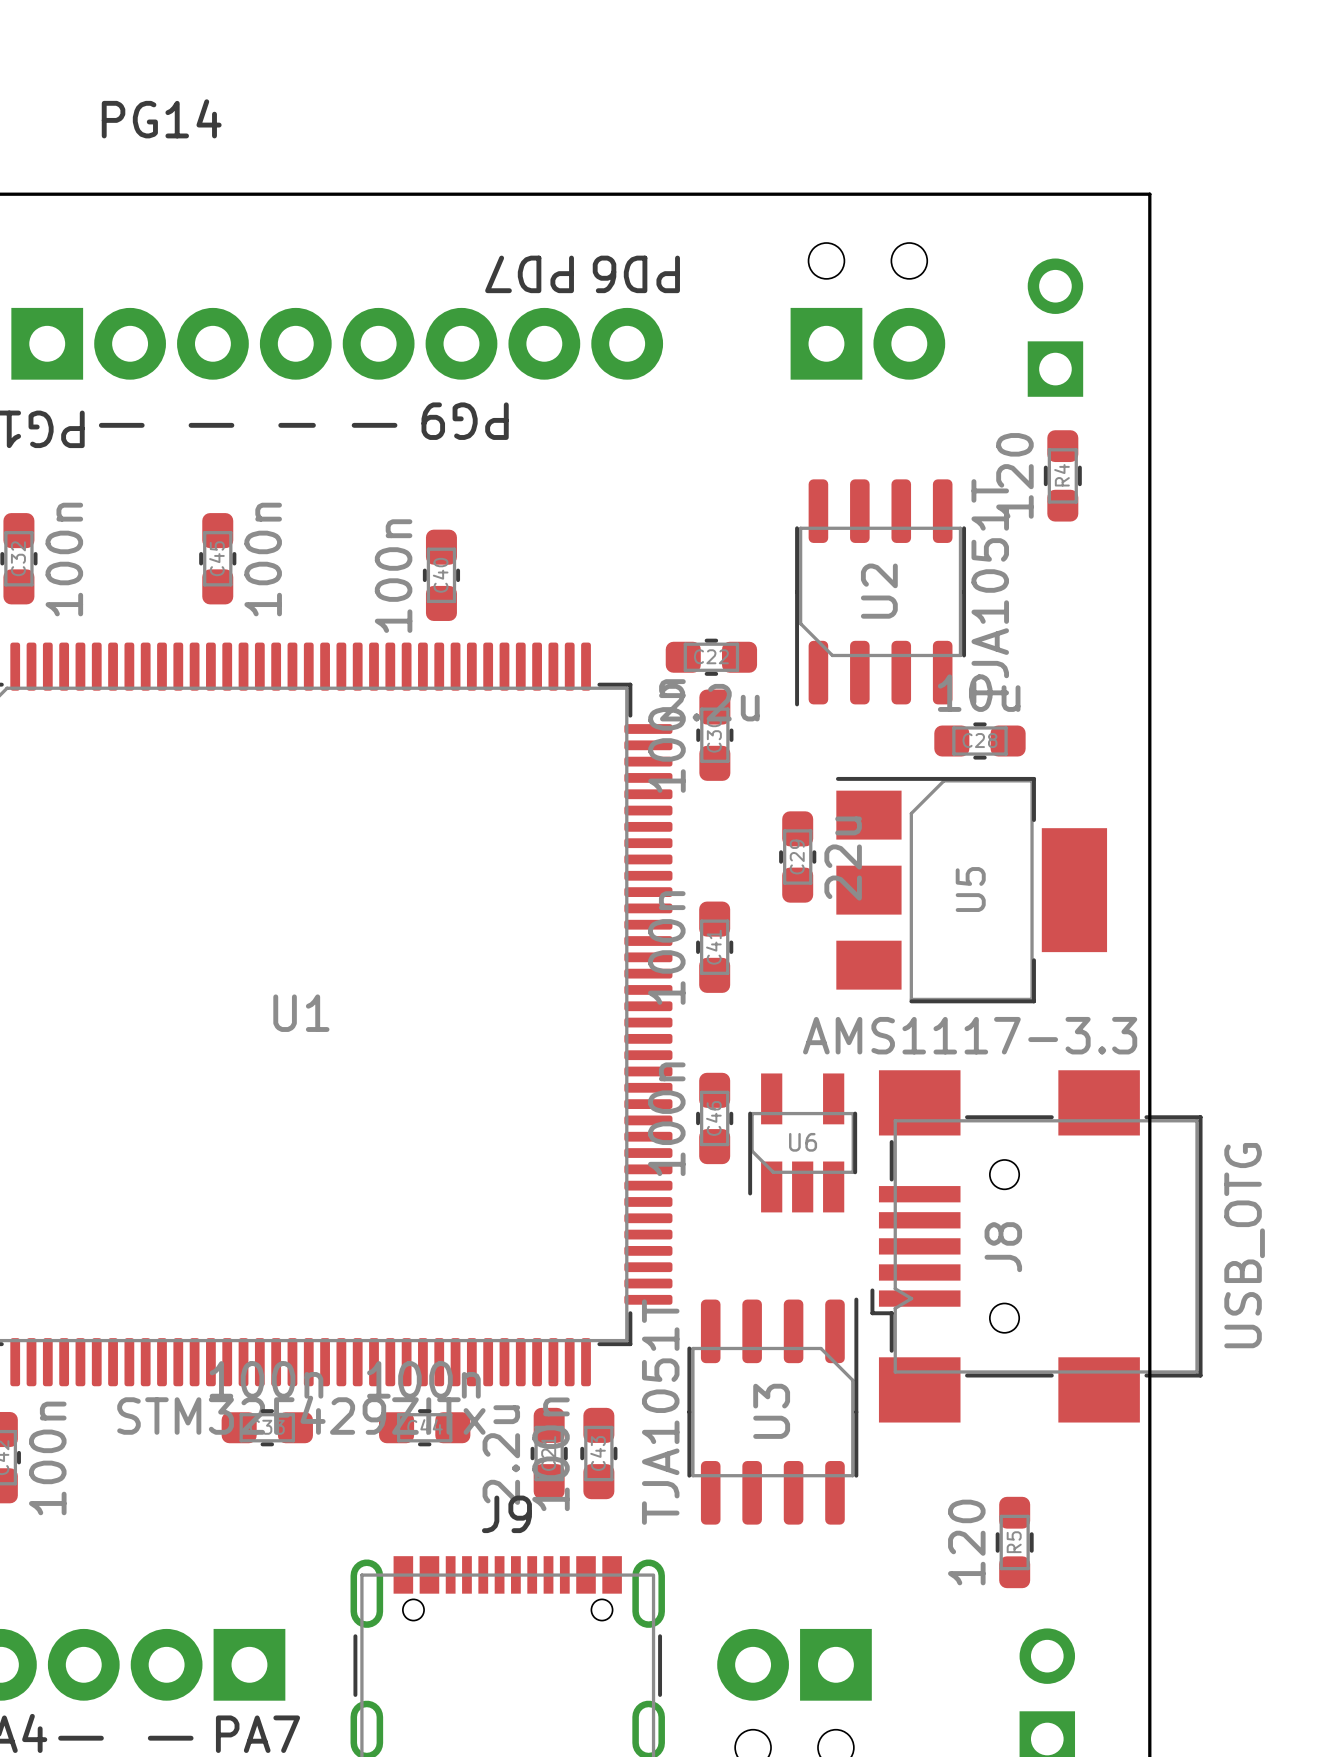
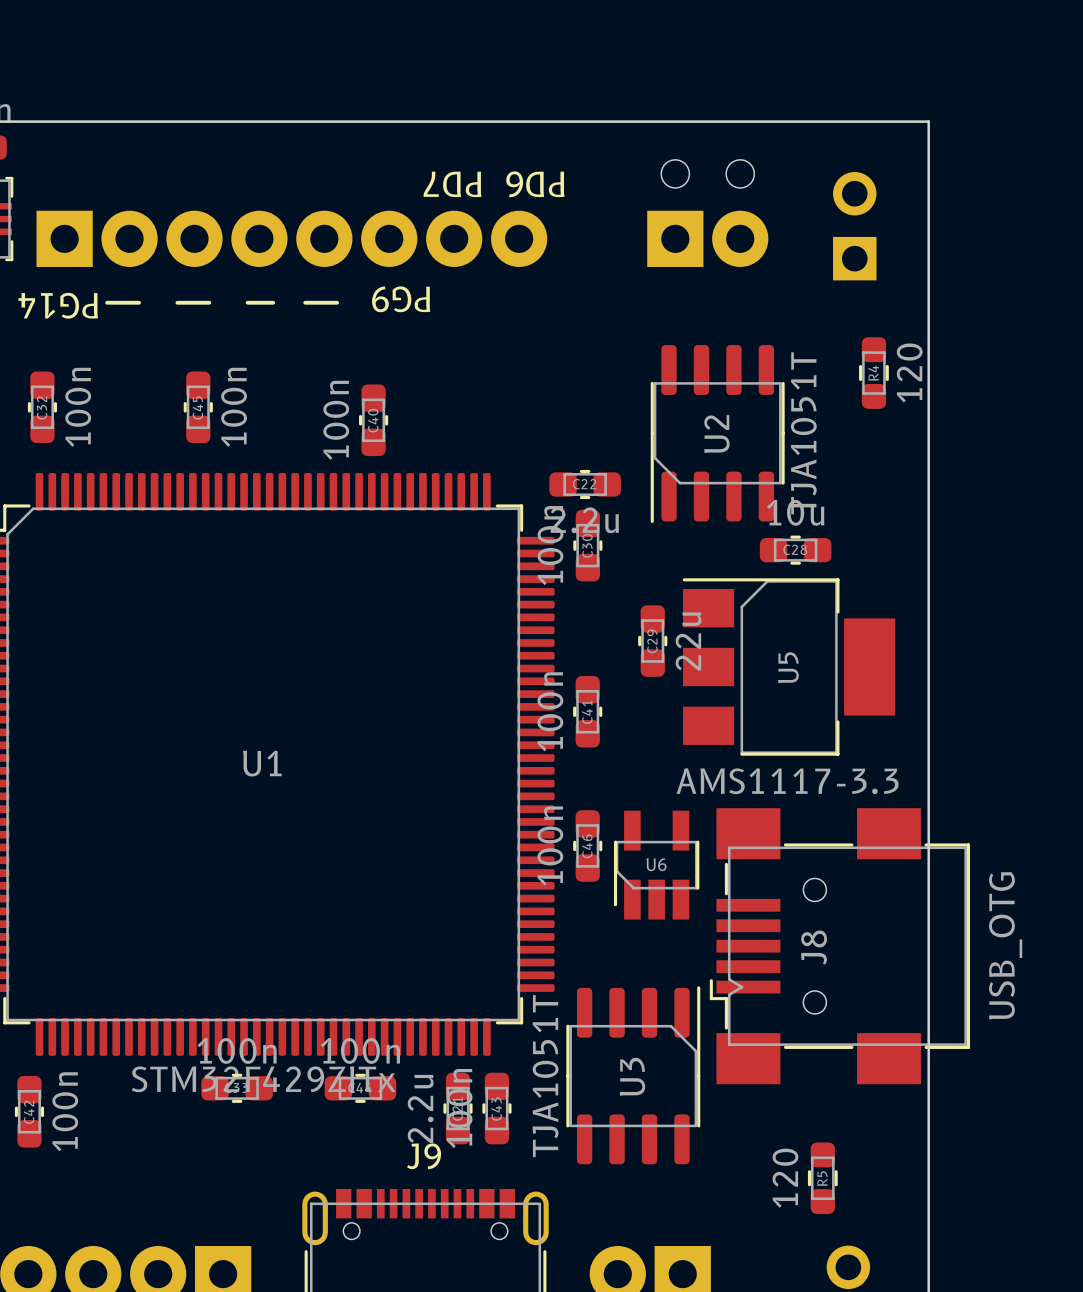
text: PG14 (161, 118) -> none
R4 value position: 120 (1014, 475) -> 120 (909, 372)
R4 position: (1062, 475) -> (873, 373)

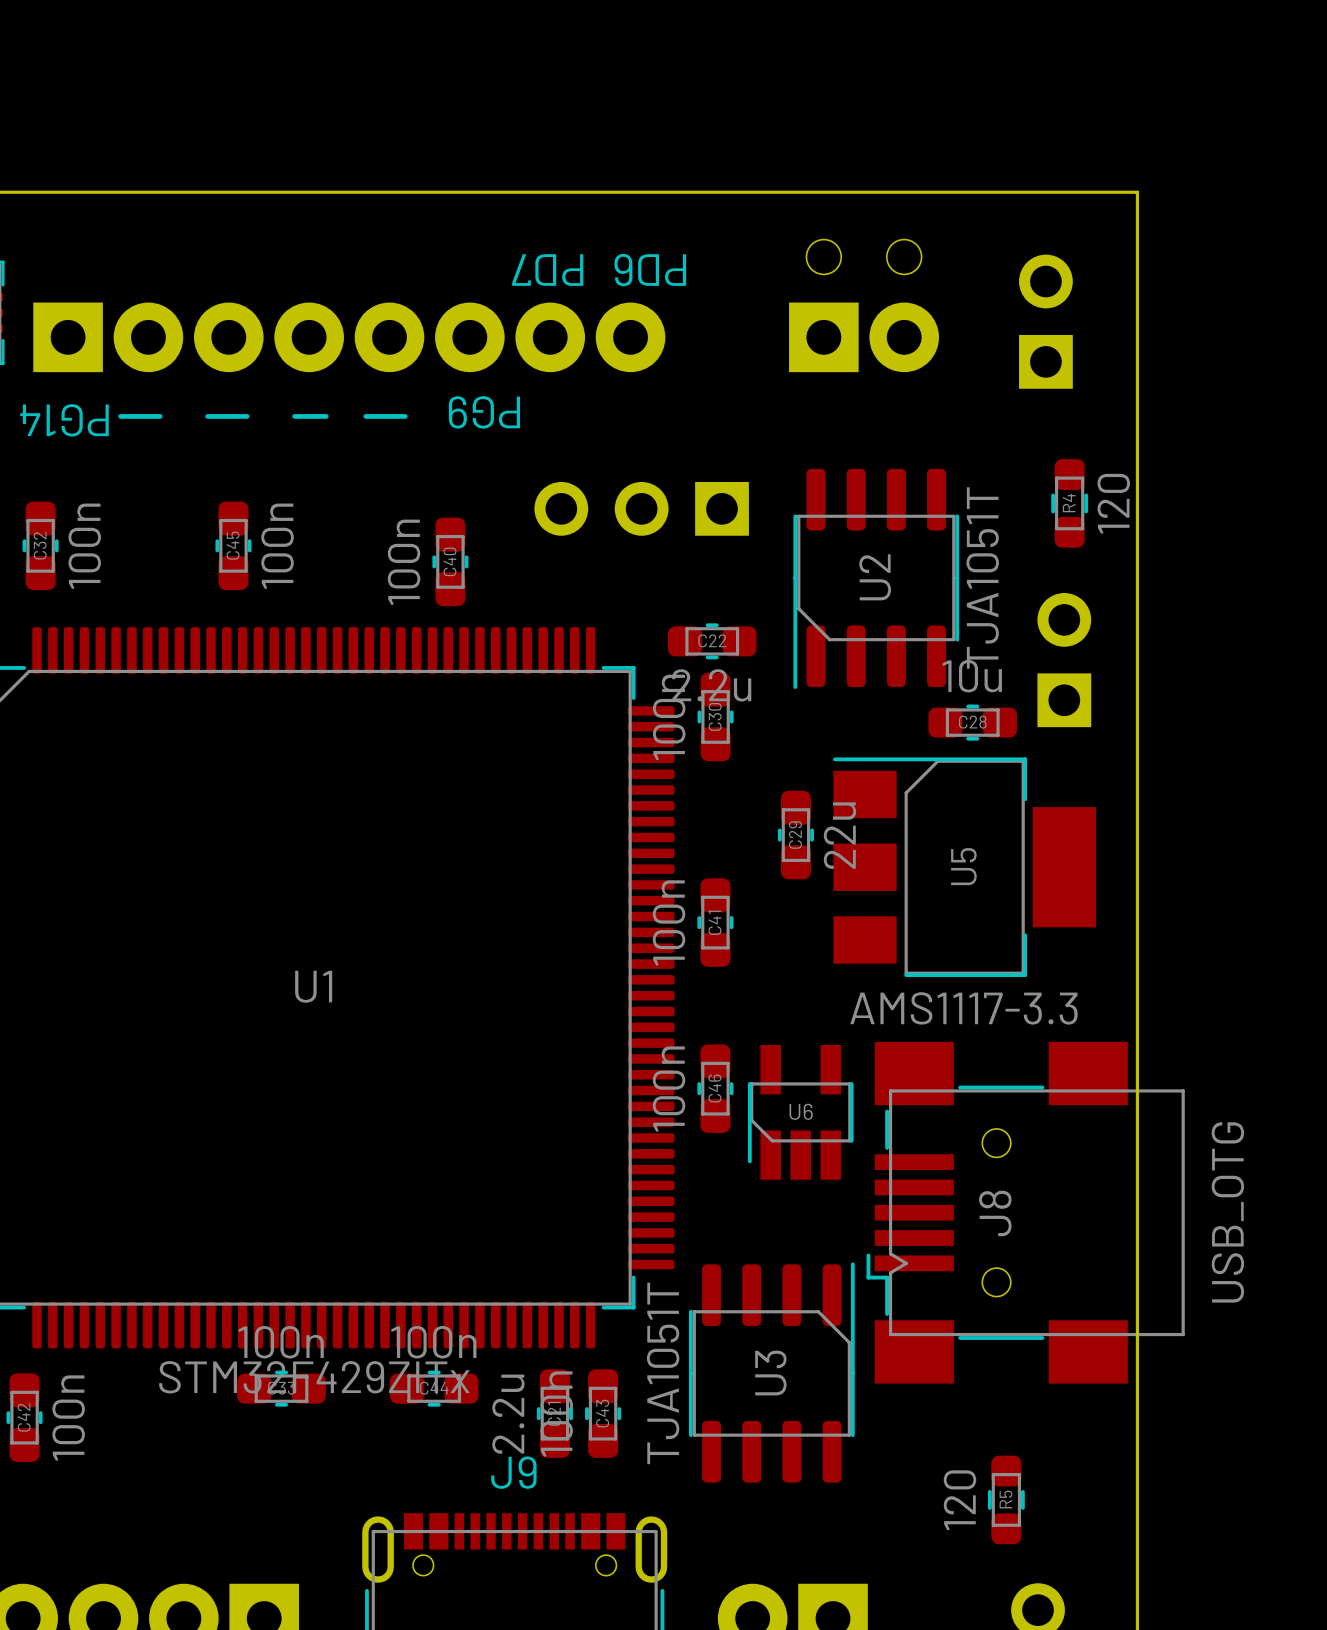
part: none -> (641, 508)
part: none -> (1064, 660)
J8 footprint: [709, 808, 971, 1085] -> [866, 1041, 1185, 1384]

